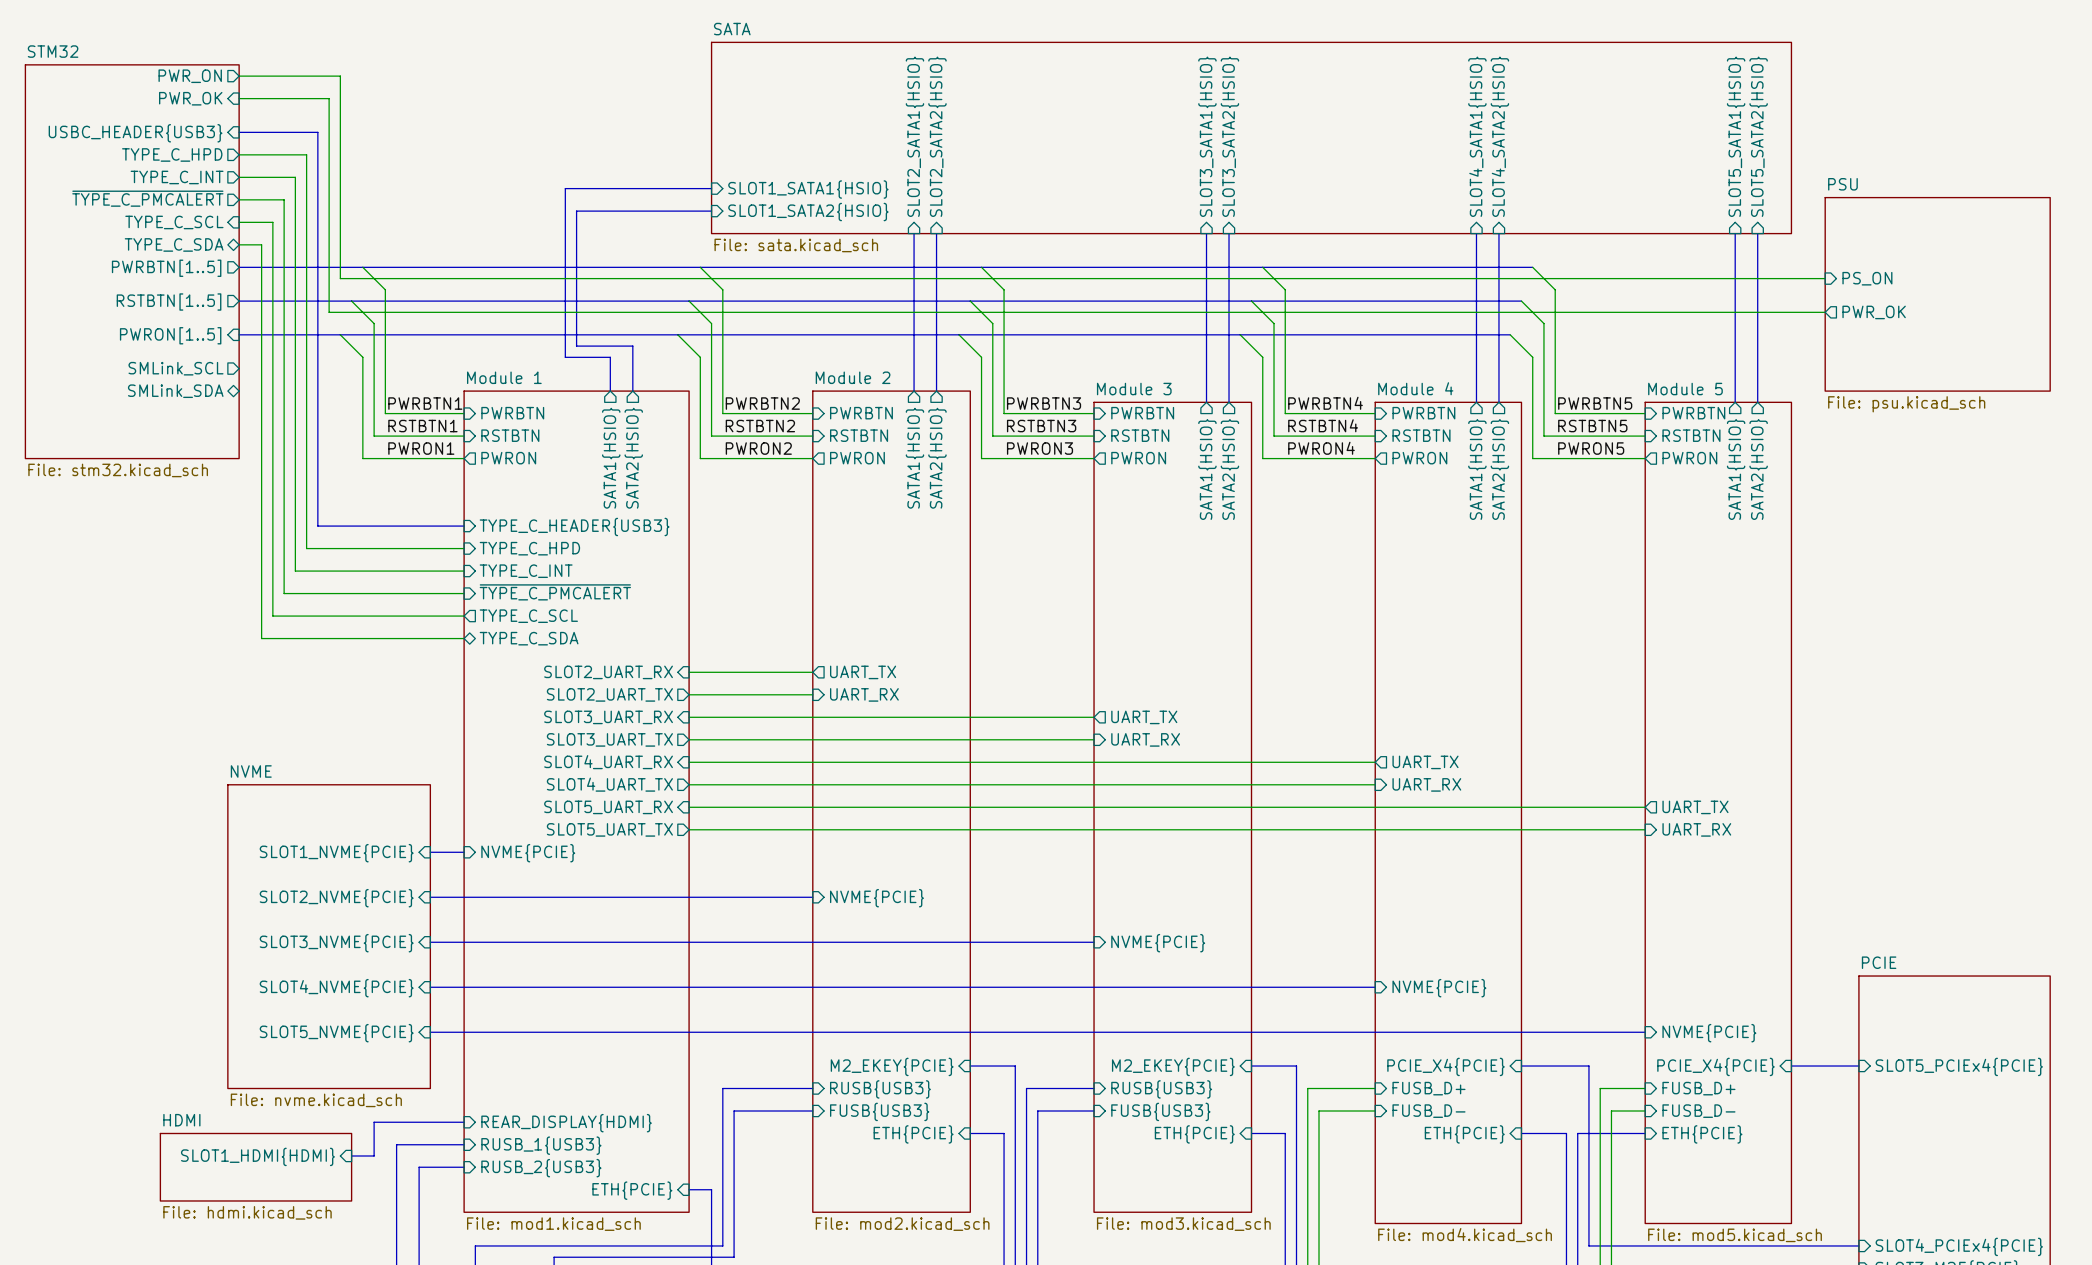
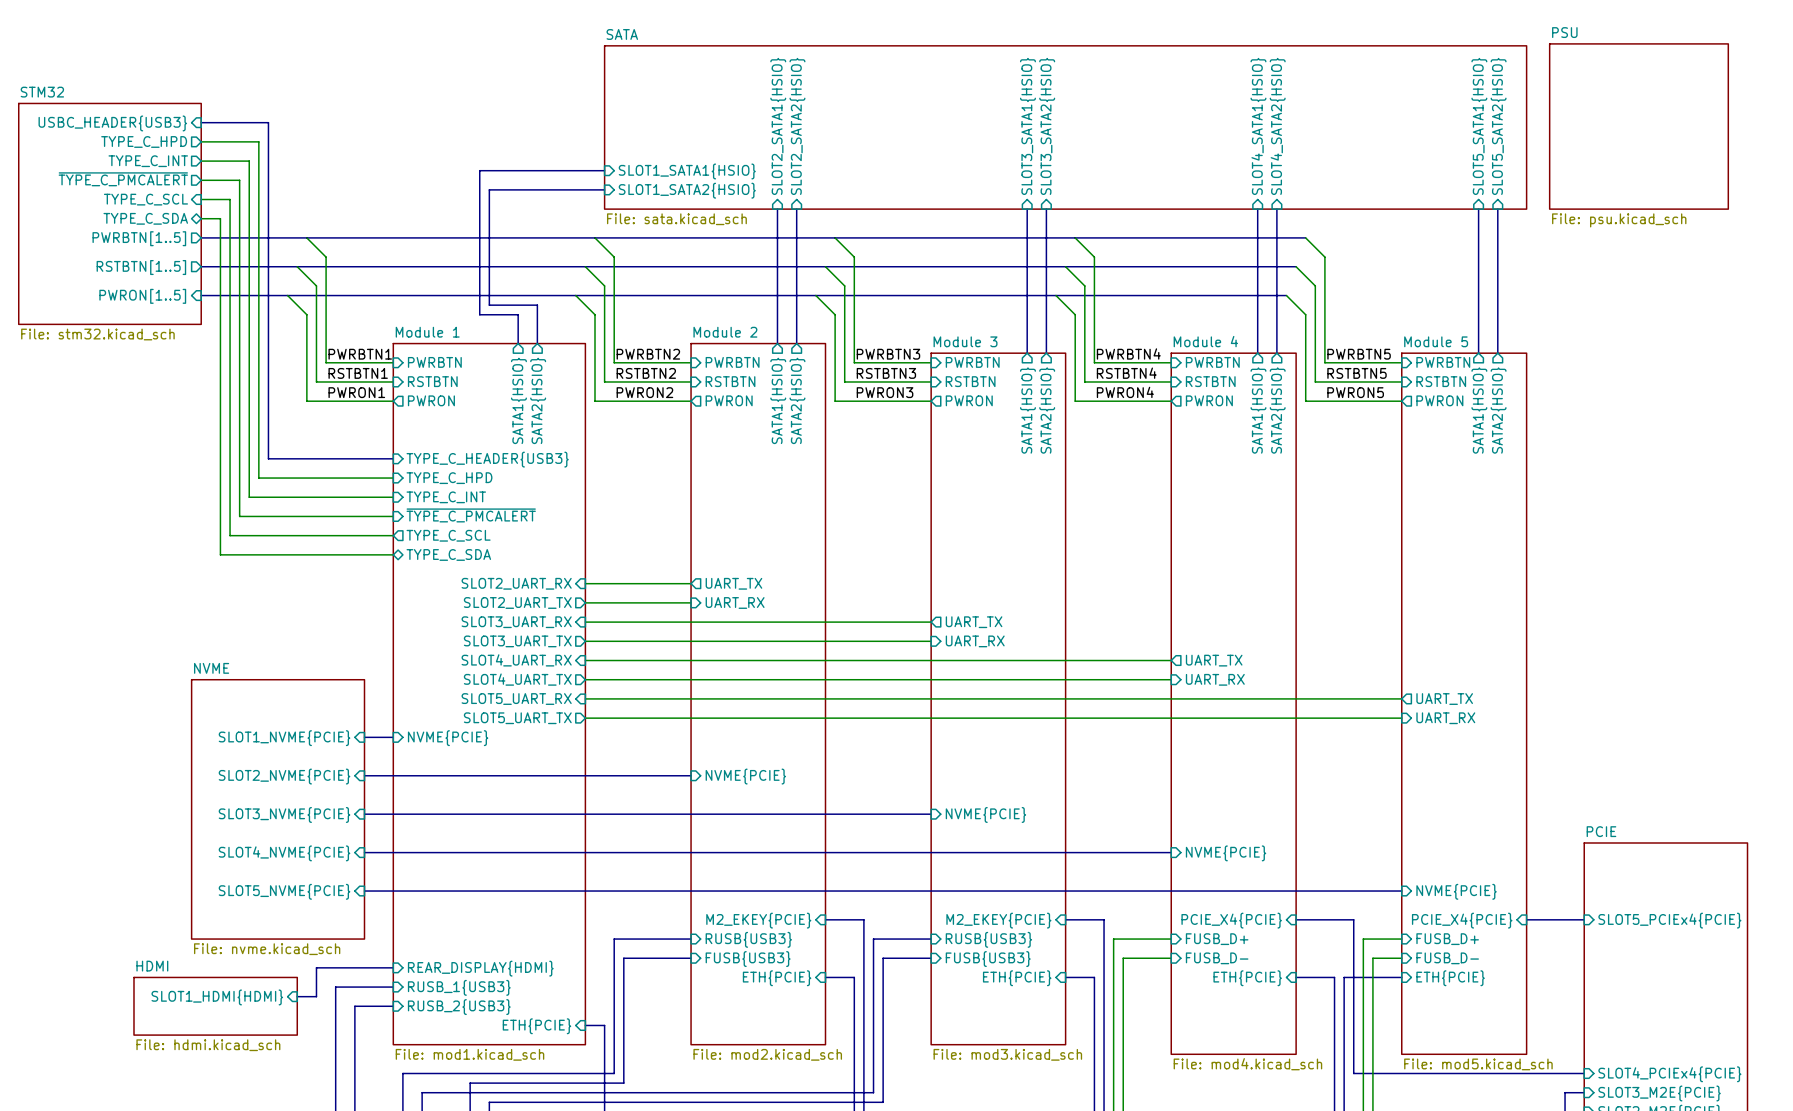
sheet STM32 name position: STM32 (53, 51) -> STM32 (42, 92)
sheet STM32 shape: [24, 64, 240, 460] -> [18, 102, 202, 325]
sheet pin: PWR_ON (190, 76) -> none
wire: (239, 76) (340, 76) (340, 278) (1825, 278) -> none
sheet pin: PWR_OK (190, 98) -> none
wire: (239, 98) (329, 98) (329, 312) (1825, 312) -> none
sheet PSU: none -> File: psu.kicad_sch (1638, 126)
sheet pin: PS_ON (1867, 278) -> none
sheet PSU: File: psu.kicad_sch (1937, 294) -> none
sheet pin: PWR_OK (1874, 312) -> none
sheet pin: SMLink_SCL (176, 368) -> none
sheet pin: SMLink_SDA (175, 391) -> none
sheet STM32 value position: File: stm32.kicad_sch (118, 470) -> File: stm32.kicad_sch (97, 334)

